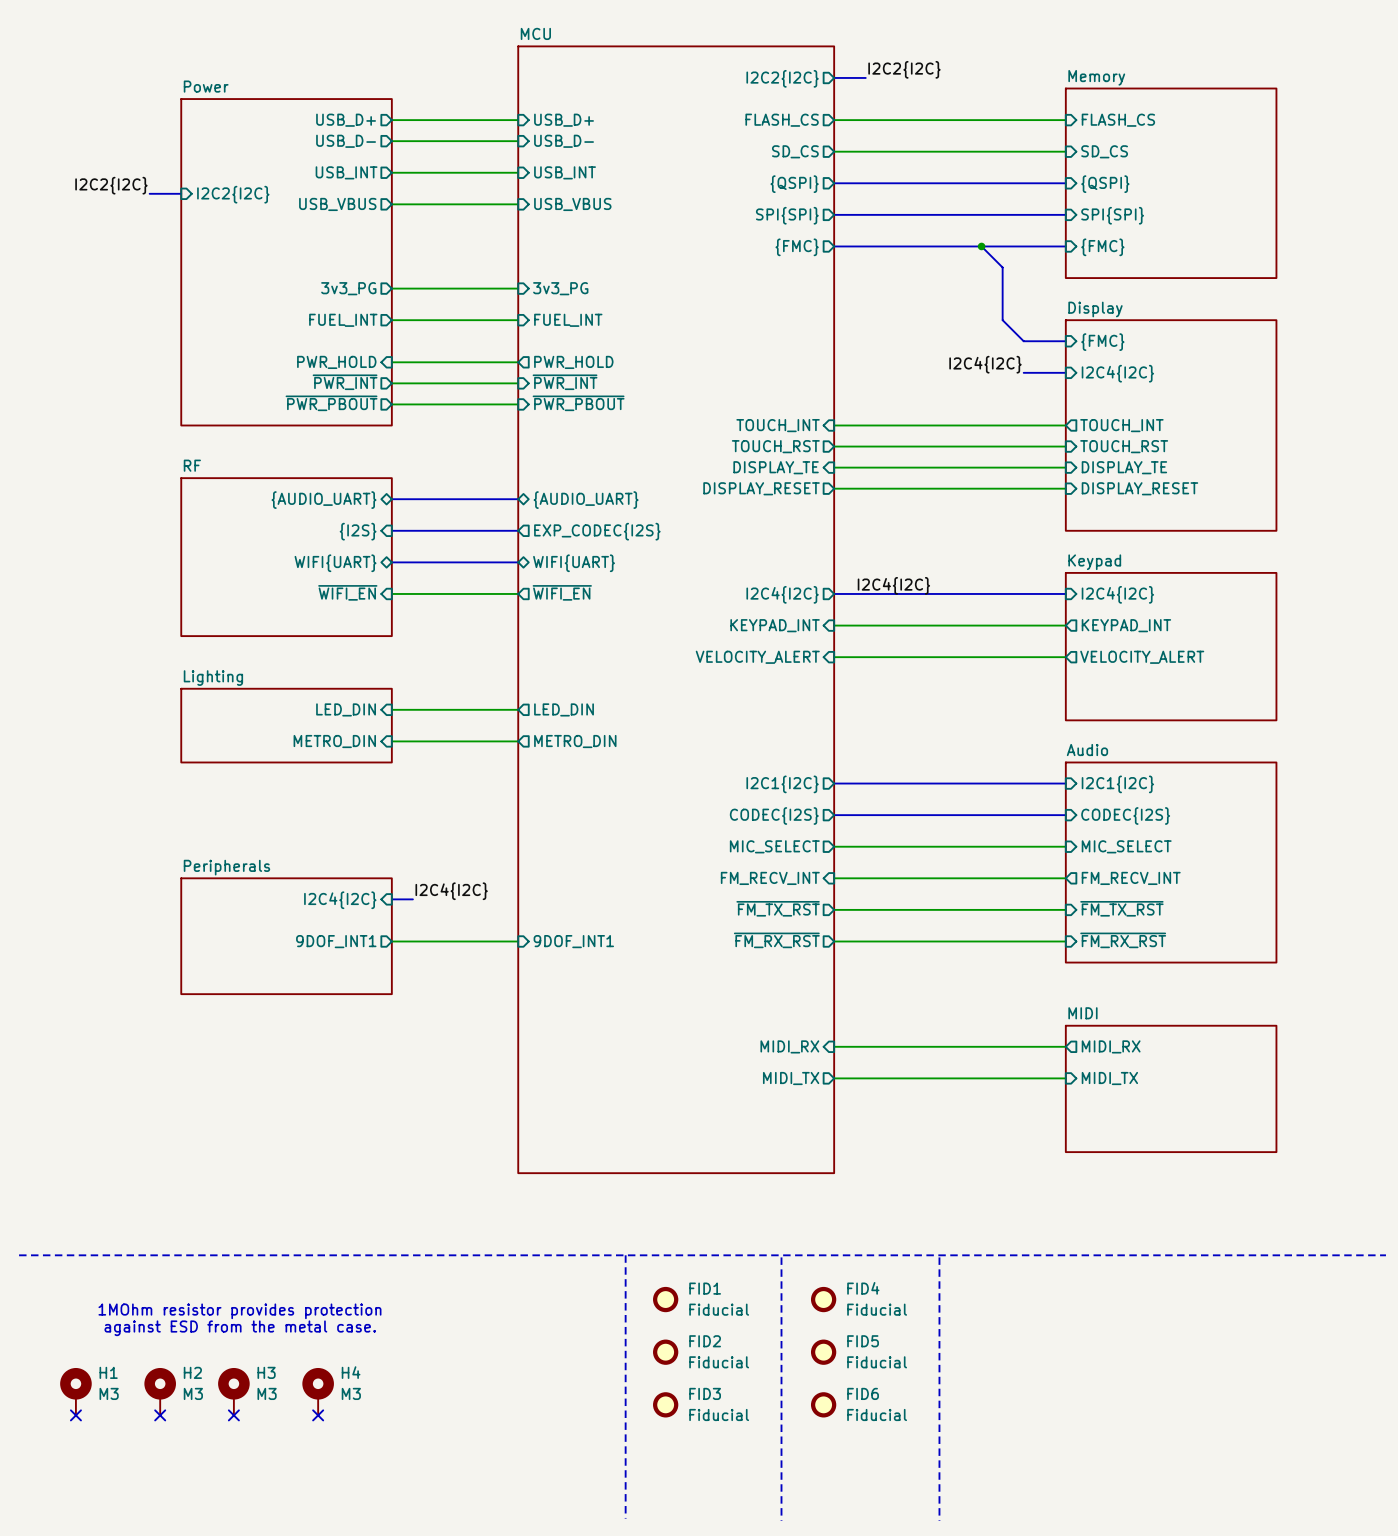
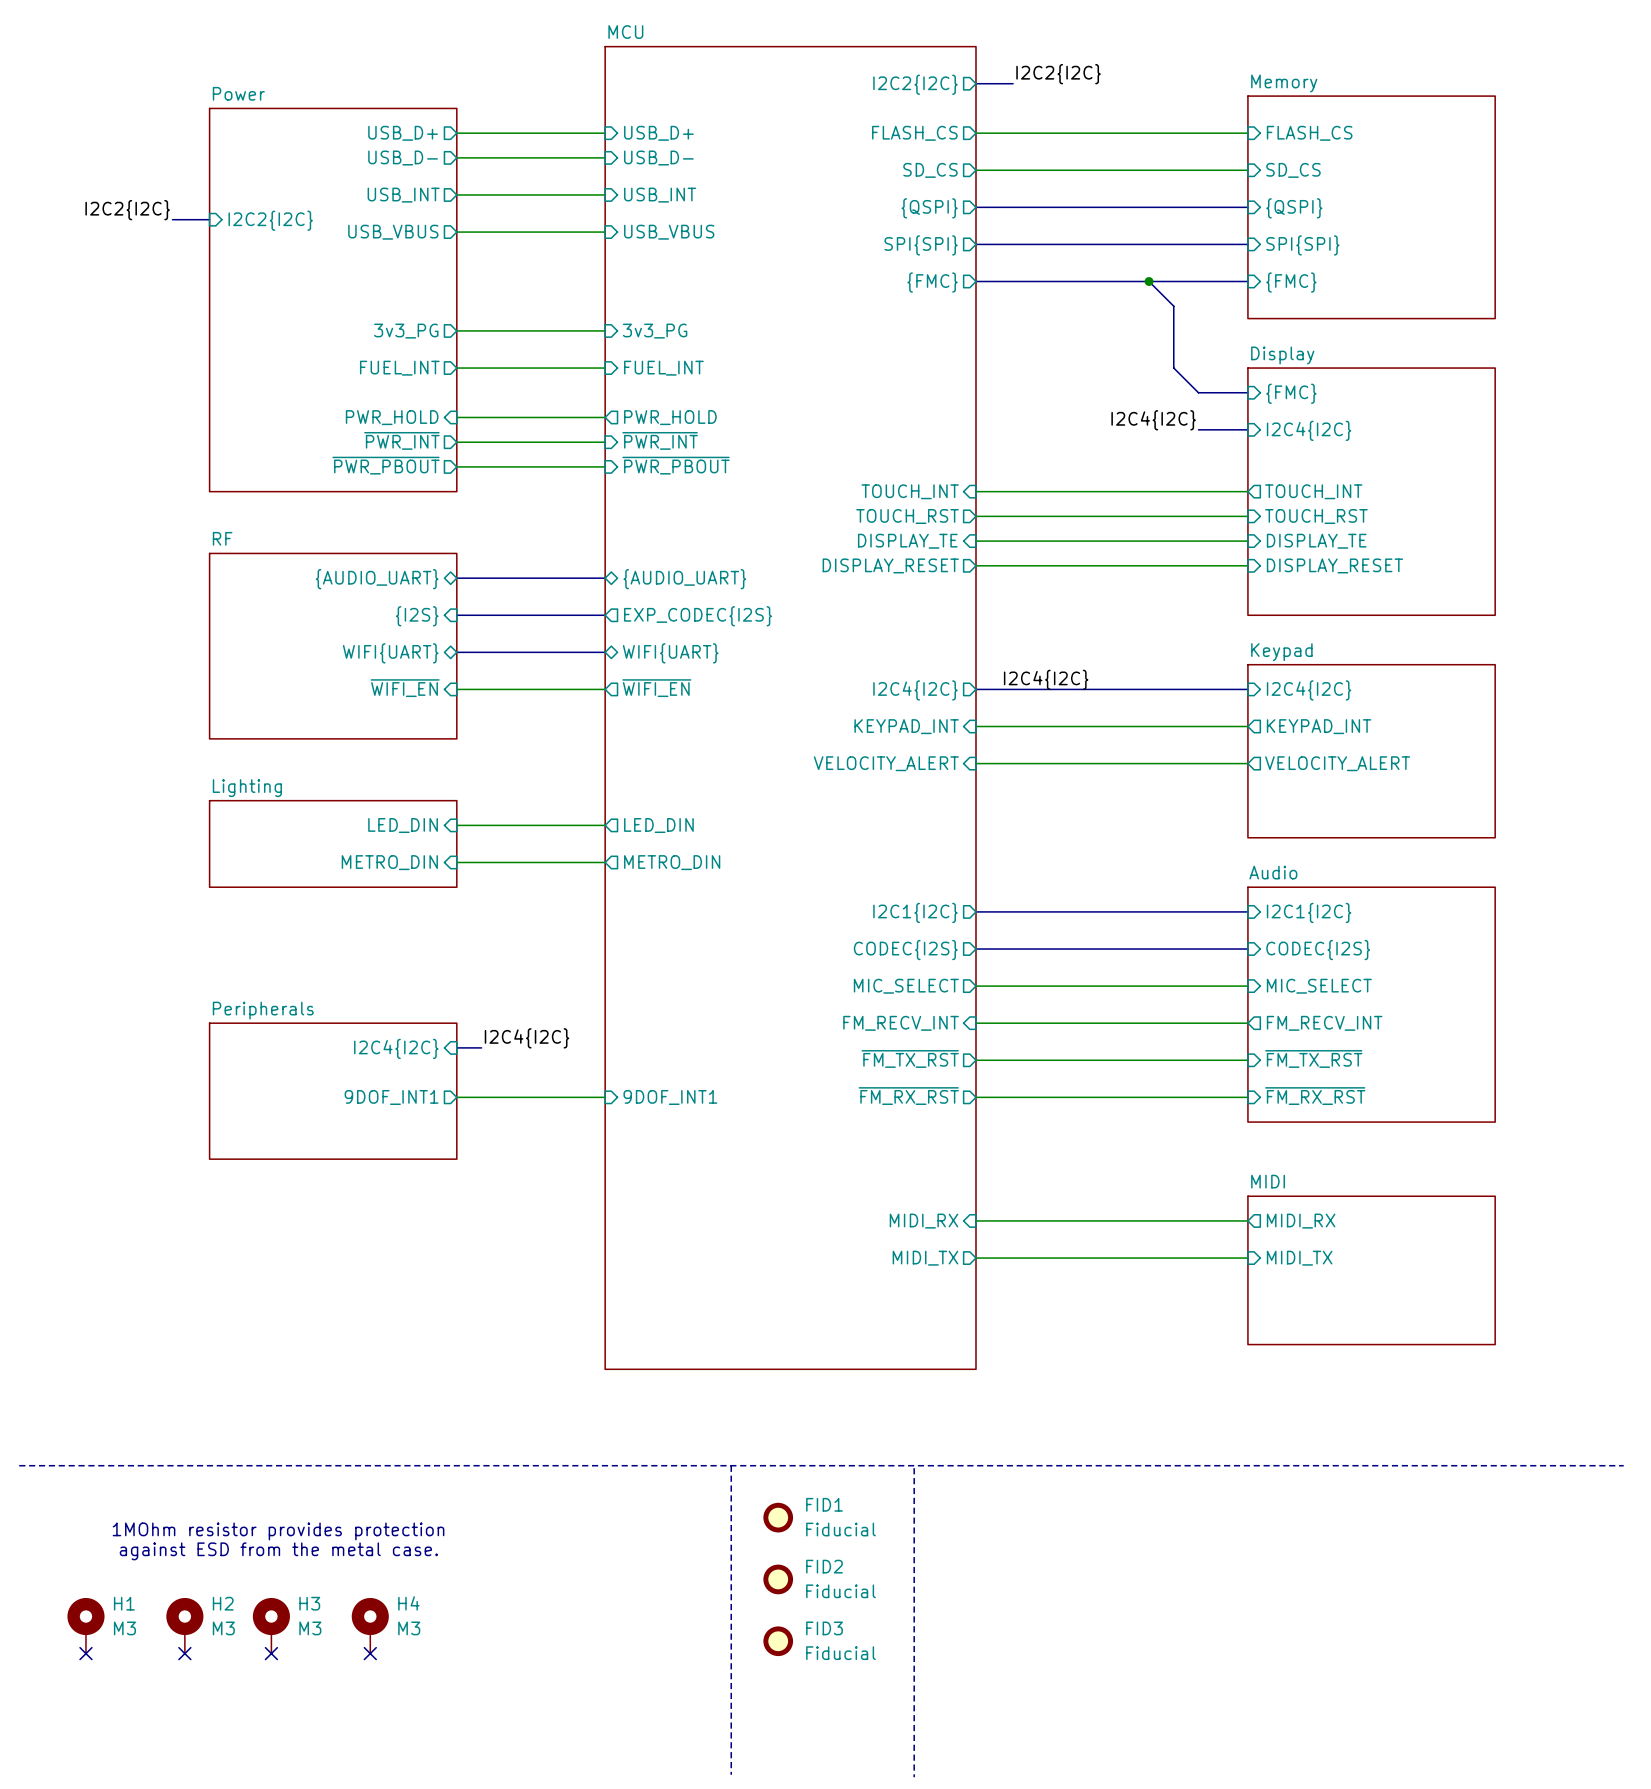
line: (939, 1257) (939, 1520) -> none
FID4: Fiducial (823, 1299) -> none
FID5: Fiducial (823, 1352) -> none
FID6: Fiducial (823, 1404) -> none

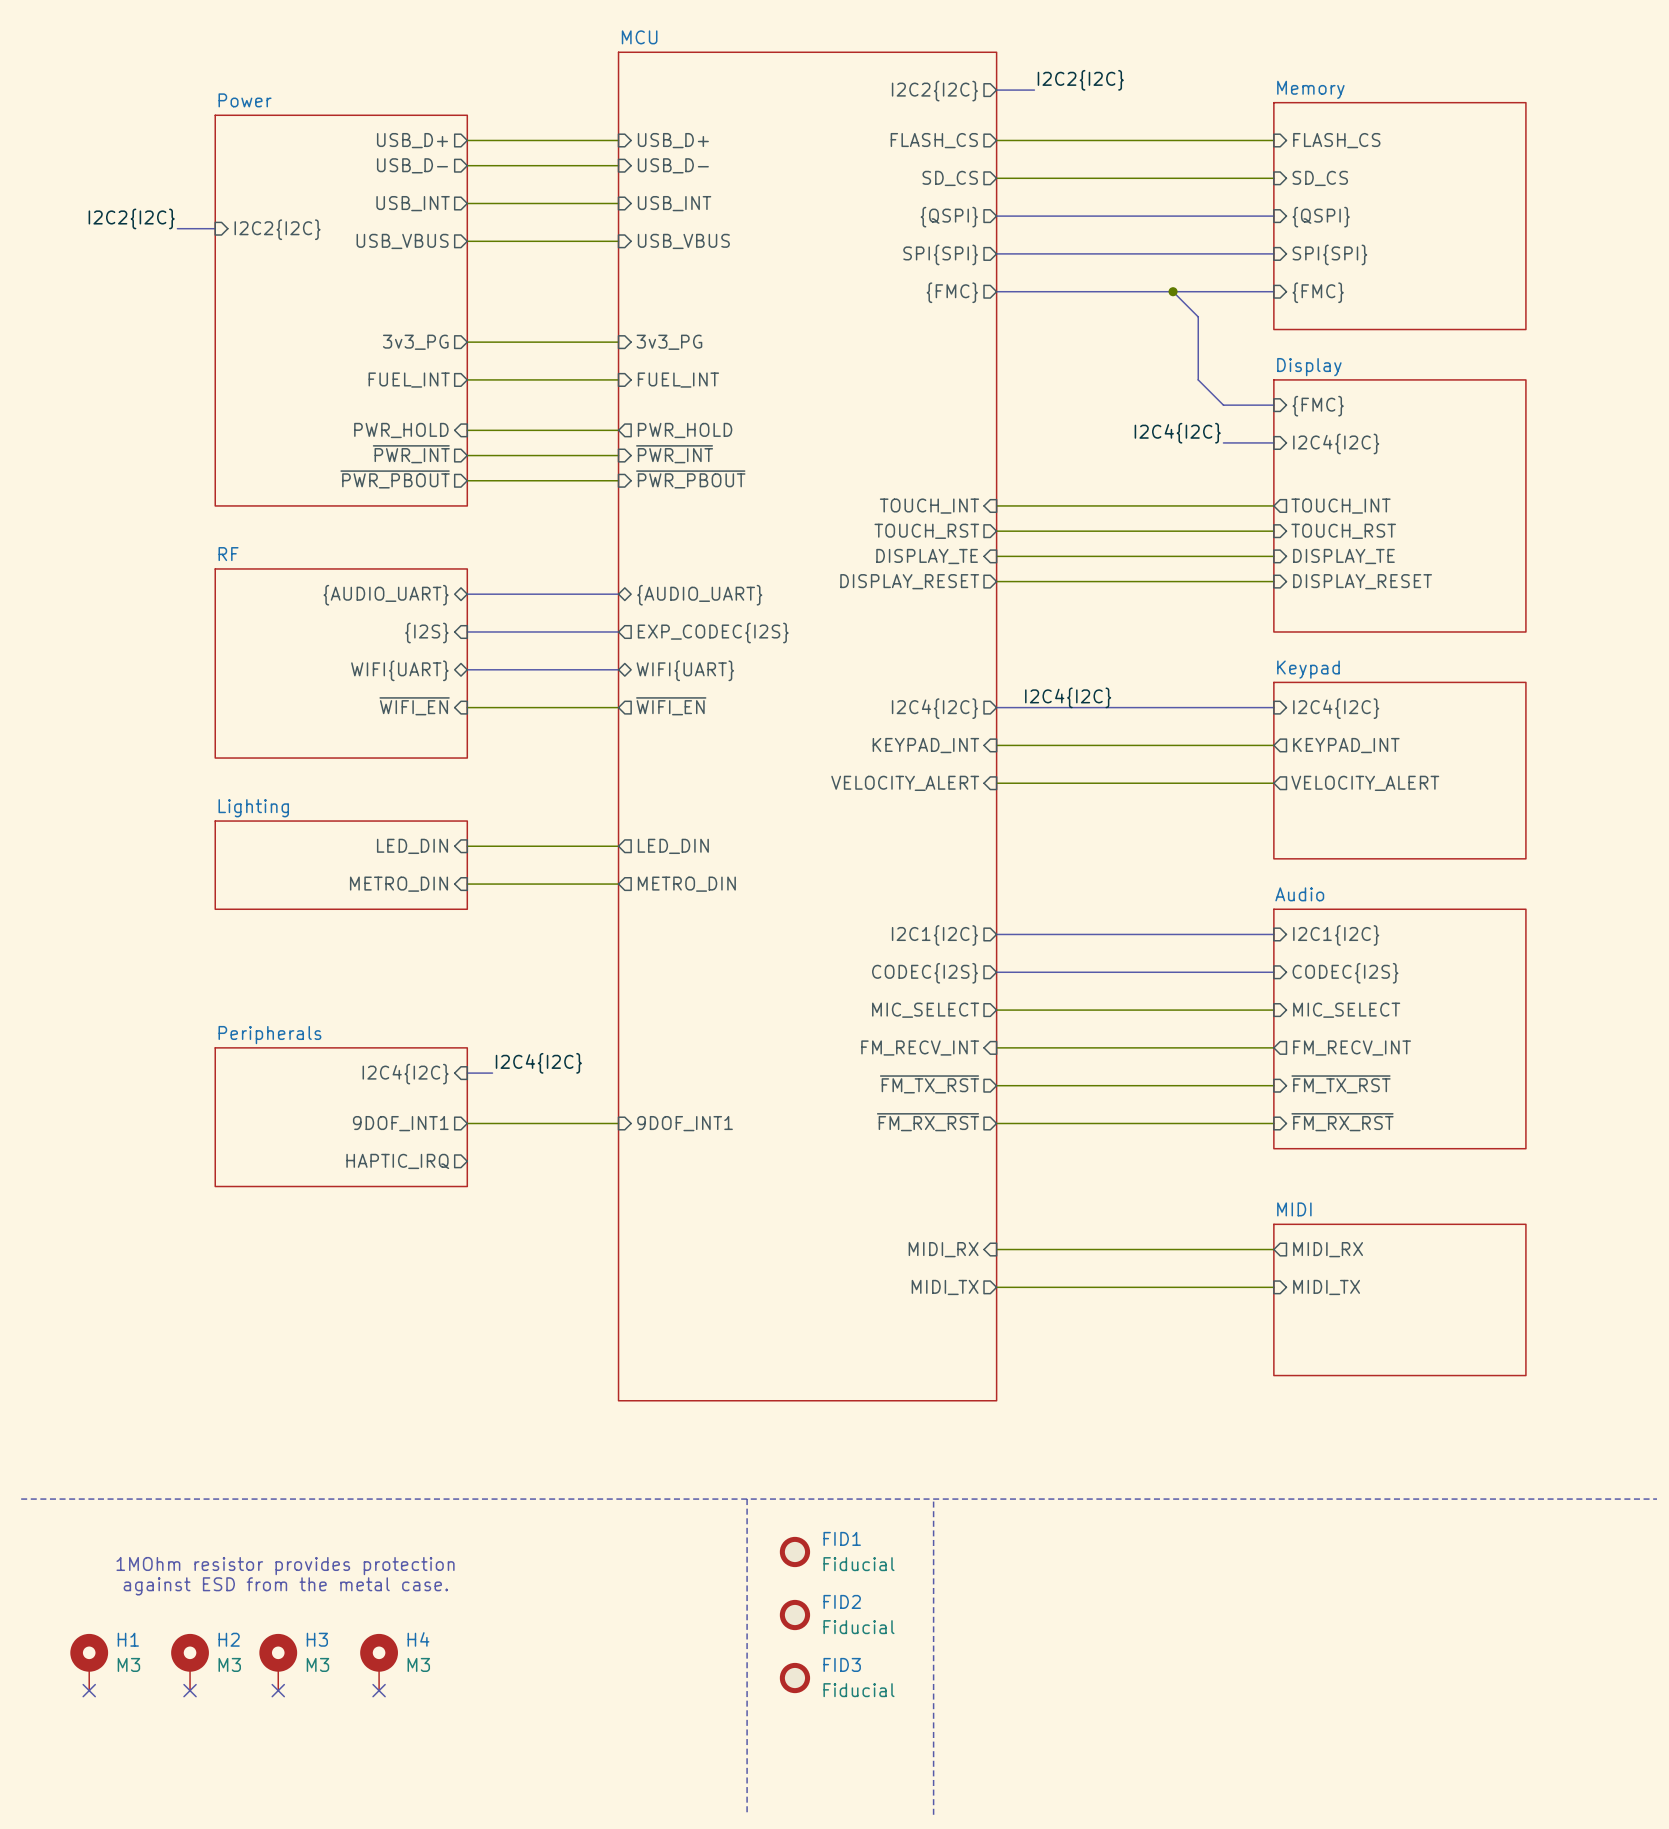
sheet pin: none -> HAPTIC_IRQ (397, 1161)

